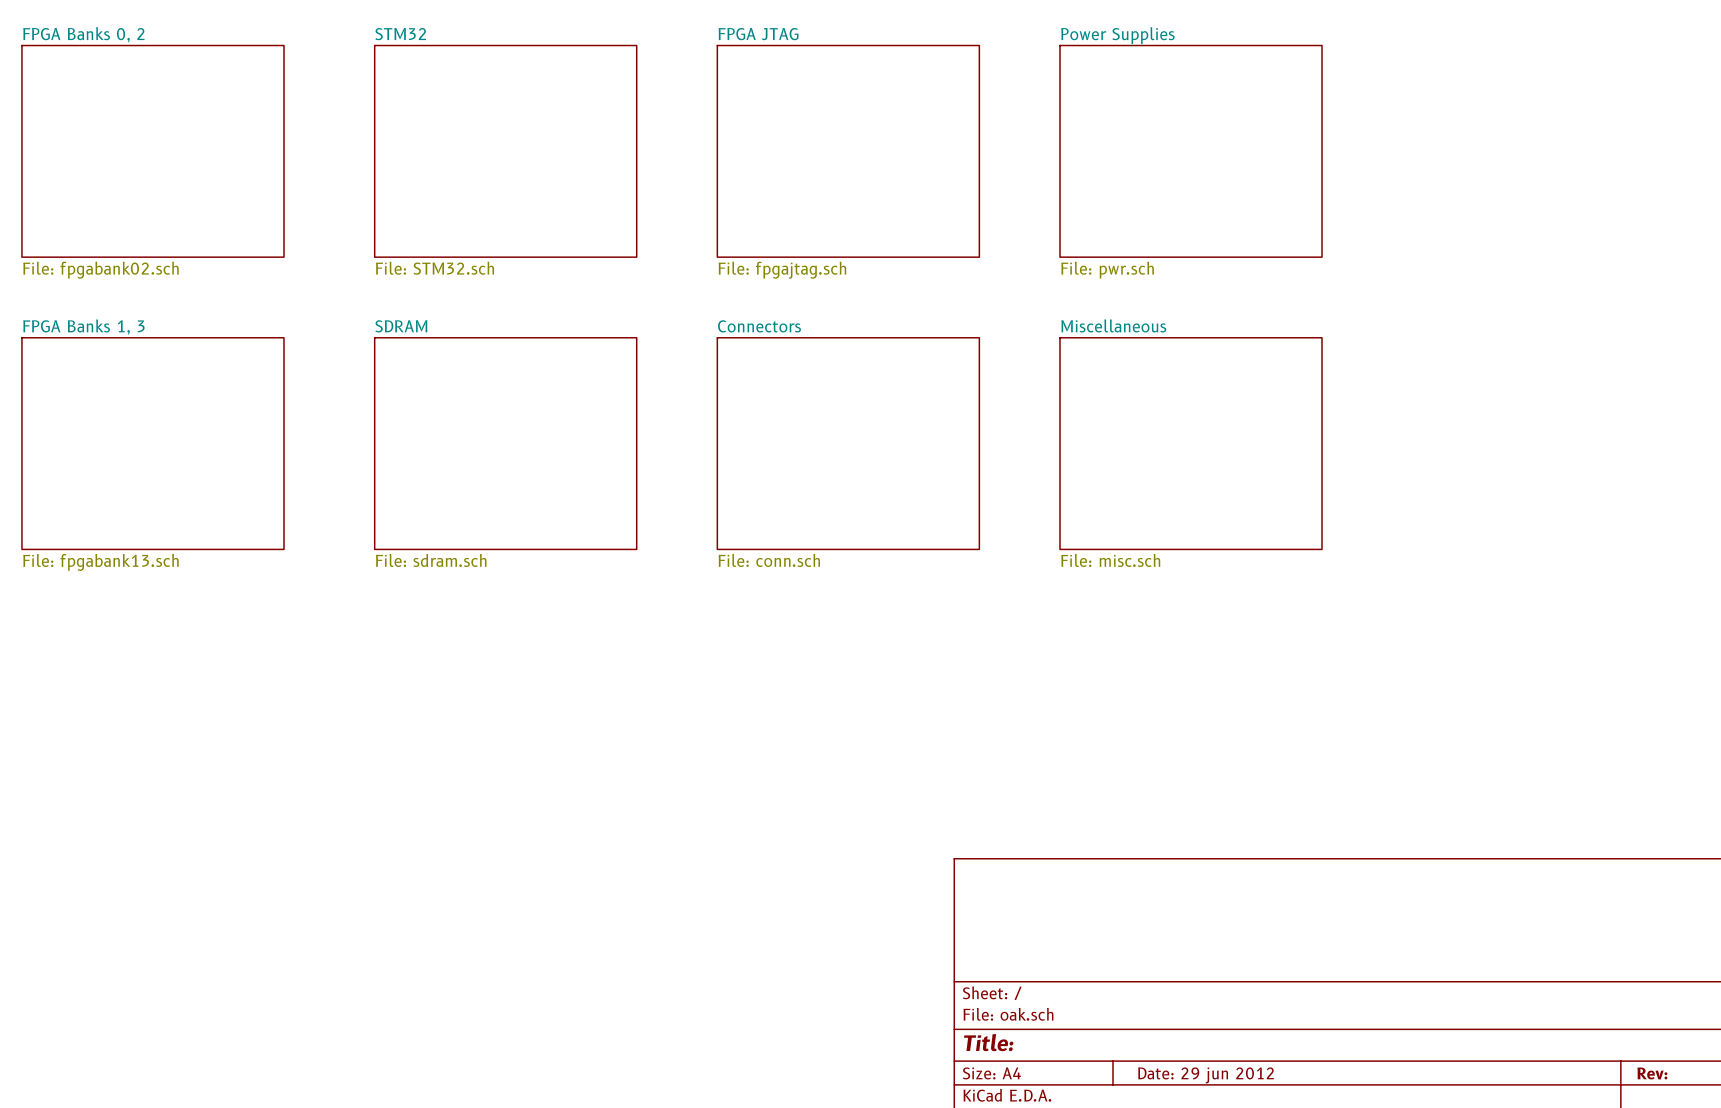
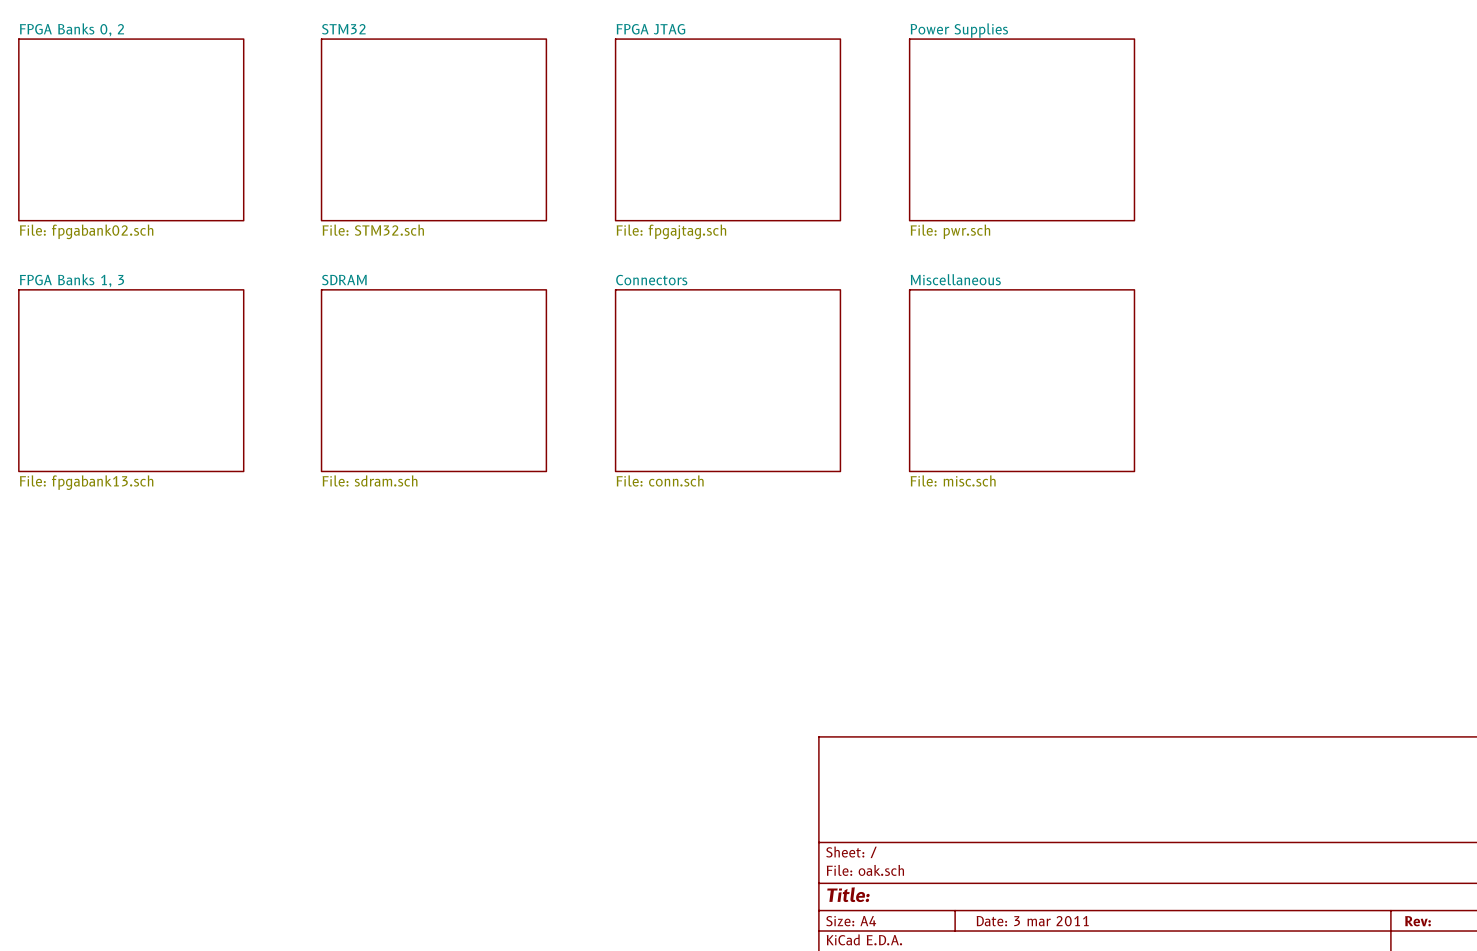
title block: Date: 29 jun 2012 (1206, 1075) -> Date: 3 mar 2011 (1032, 921)

